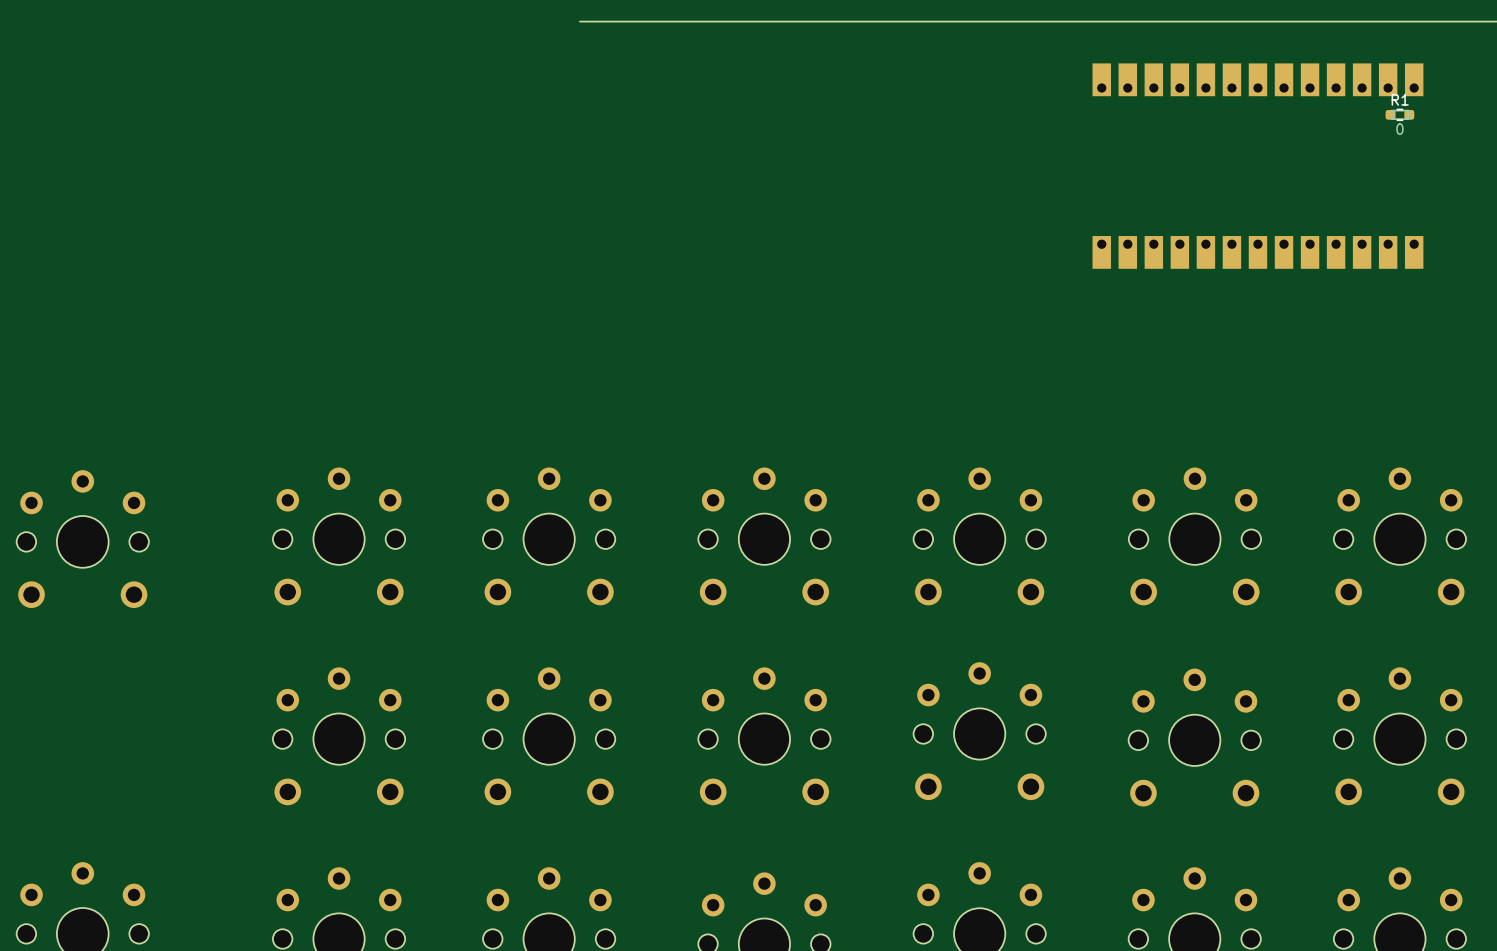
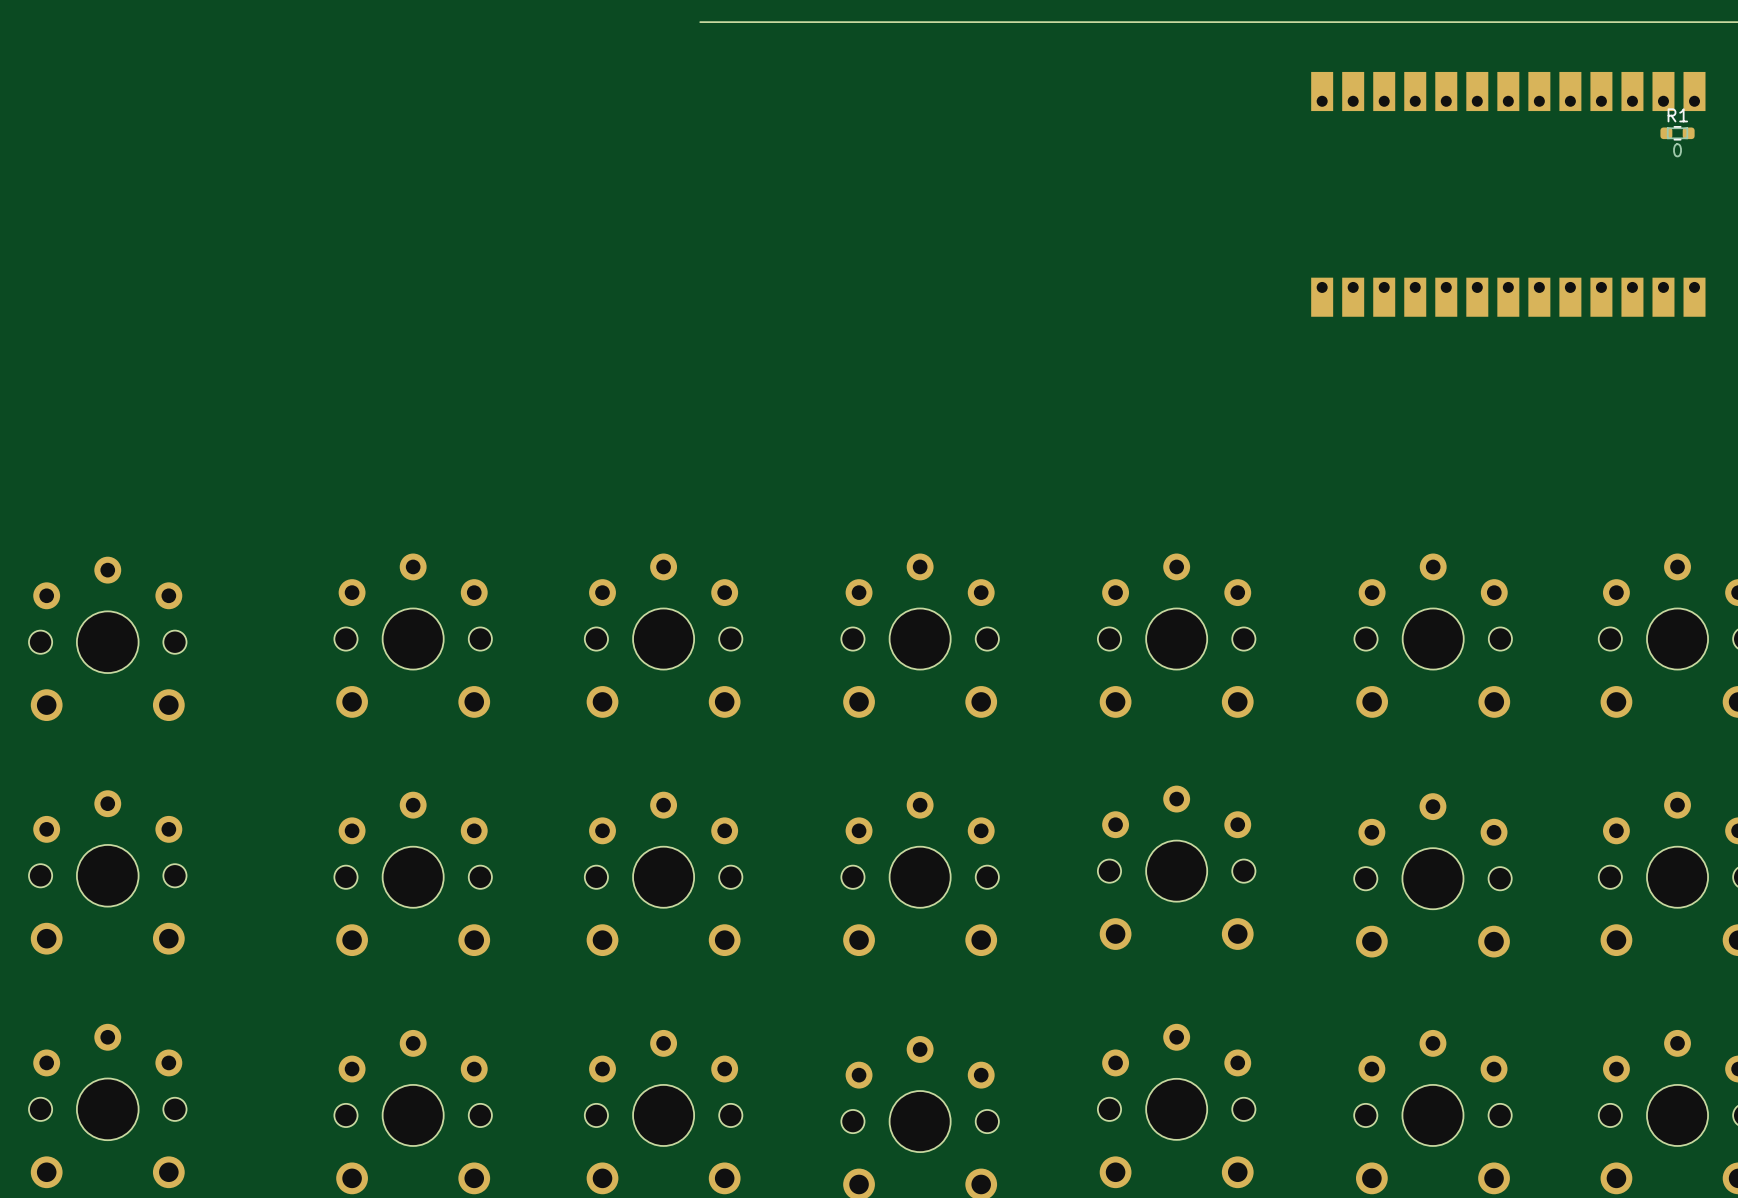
part: none -> (107, 872)

